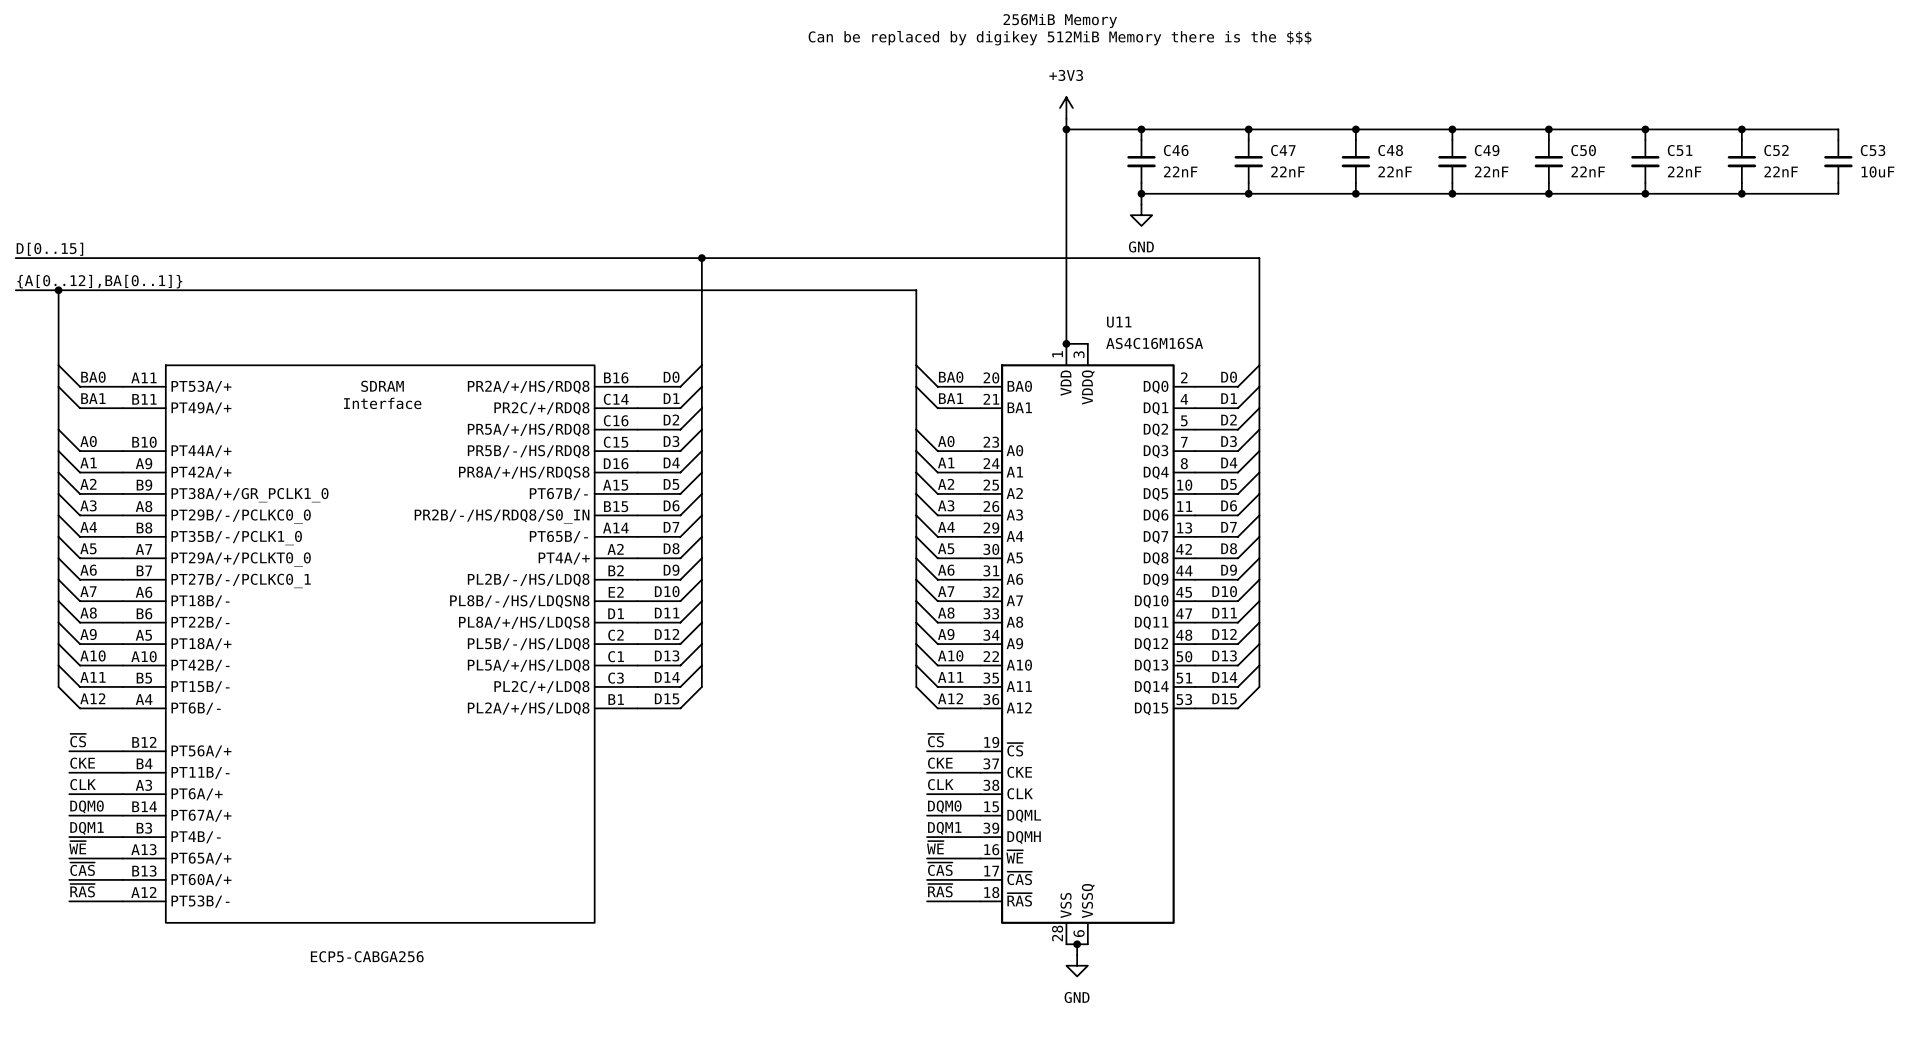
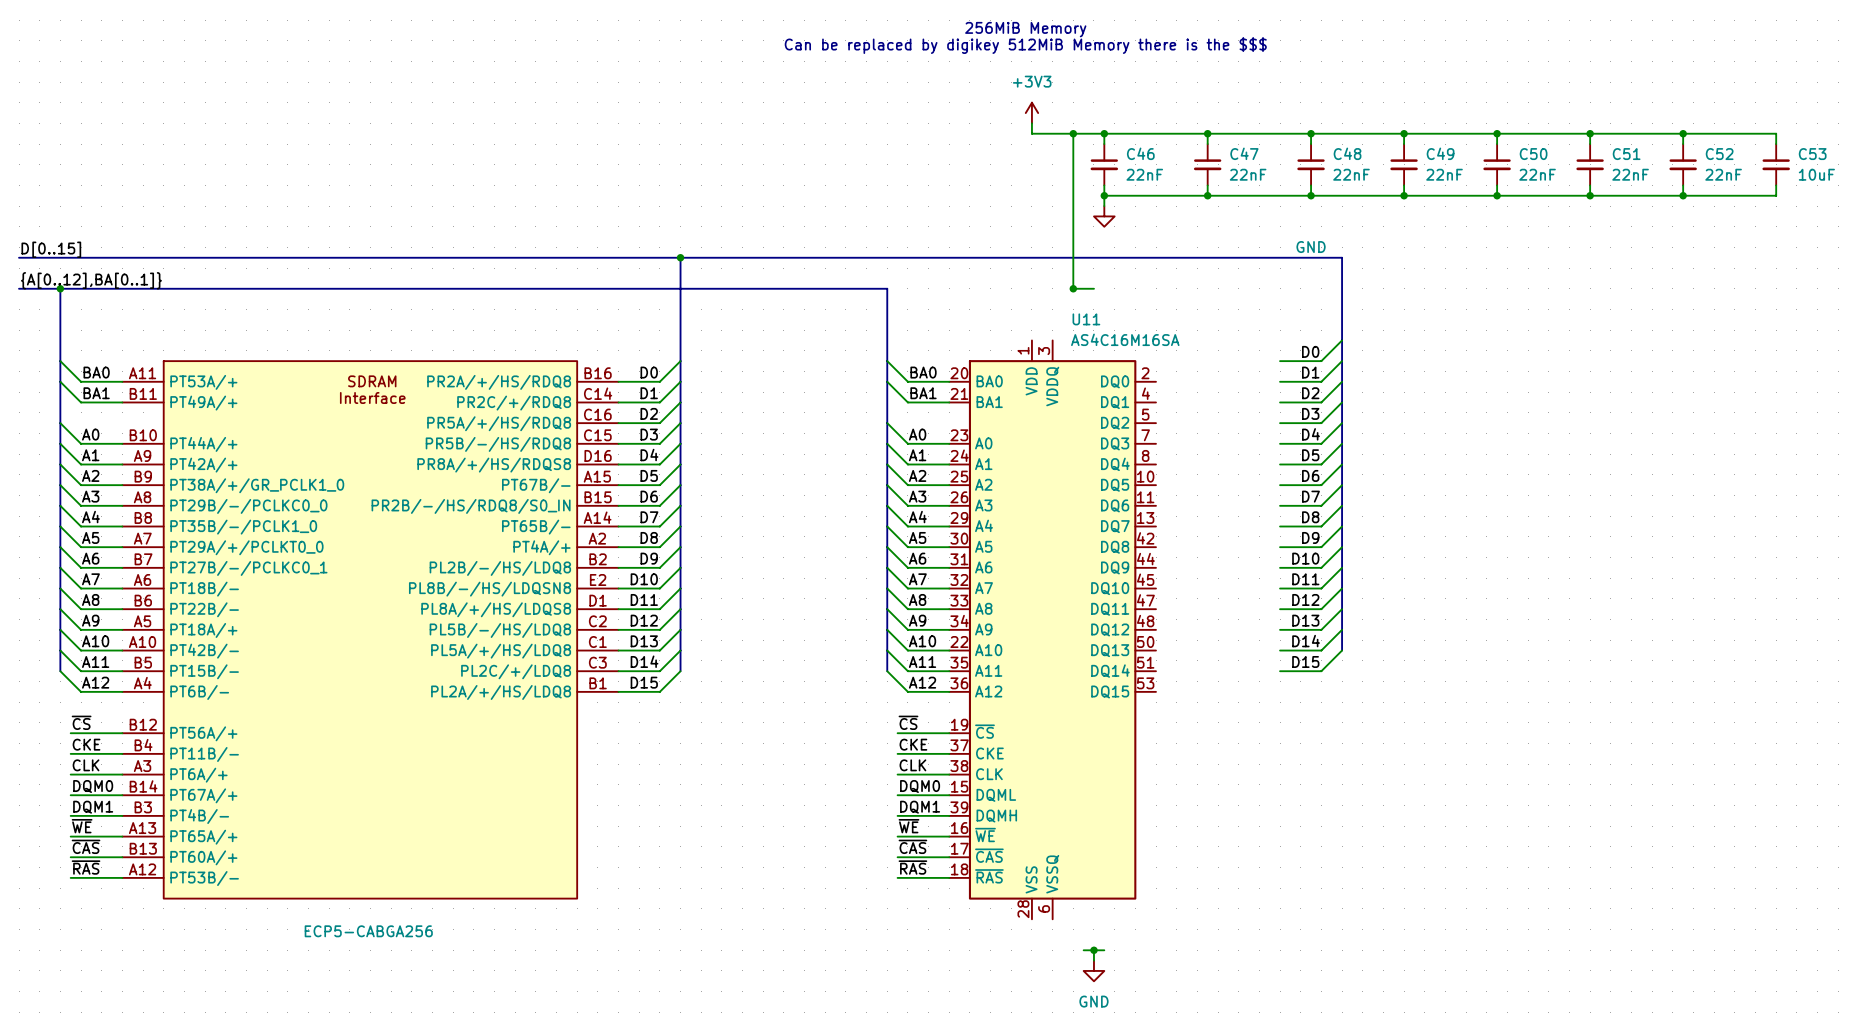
wire: (1066, 129) (1066, 343) (1087, 343) -> none
junction position: (1066, 129) -> (1073, 133)
wire: none -> (1073, 133) (1073, 288) (1093, 288)
power symbol text position: GND (1141, 246) -> GND (1311, 247)
bus: (1259, 258) (1259, 686) -> (1218, 257) (1342, 257) (1342, 650)
junction: none -> (1073, 288)
junction: (1066, 343) -> none
wire: (1259, 365) (1237, 386) (1195, 386) -> (1342, 340) (1321, 361) (1280, 361)
label position: D0 (1229, 377) -> D0 (1310, 351)
wire: (1259, 386) (1237, 408) (1195, 408) -> (1342, 361) (1321, 381) (1280, 381)
label position: D1 (1229, 398) -> D1 (1310, 372)
wire: (1259, 408) (1237, 429) (1195, 429) -> (1342, 381) (1321, 402) (1280, 402)
label position: D2 (1228, 419) -> D2 (1310, 393)
wire: (1259, 429) (1237, 451) (1195, 451) -> (1342, 402) (1321, 423) (1280, 423)
label position: D3 (1229, 441) -> D3 (1310, 413)
wire: (1259, 451) (1237, 472) (1195, 472) -> (1342, 423) (1321, 443) (1280, 443)
label position: D4 (1229, 462) -> D4 (1310, 434)
wire: (1259, 472) (1237, 493) (1195, 493) -> (1342, 443) (1321, 464) (1280, 464)
label position: D5 (1229, 484) -> D5 (1310, 455)
wire: (1259, 493) (1237, 515) (1195, 515) -> (1342, 464) (1321, 485) (1280, 485)
label position: D6 (1229, 505) -> D6 (1310, 475)
wire: (1259, 515) (1237, 536) (1195, 536) -> (1342, 485) (1321, 505) (1280, 505)
label position: D7 (1229, 527) -> D7 (1310, 496)
wire: (1259, 536) (1237, 558) (1195, 558) -> (1342, 505) (1321, 526) (1280, 526)
label position: D8 (1229, 548) -> D8 (1310, 517)
wire: (1259, 558) (1237, 579) (1195, 579) -> (1342, 526) (1321, 547) (1280, 547)
label position: D9 (1229, 570) -> D9 (1310, 537)
wire: (1259, 579) (1237, 601) (1195, 601) -> (1342, 547) (1321, 567) (1280, 567)
label position: D10 (1224, 591) -> D10 (1305, 558)
wire: (1259, 601) (1237, 622) (1195, 622) -> (1342, 567) (1321, 588) (1280, 588)
label position: D11 (1224, 613) -> D11 (1305, 579)
wire: (1259, 622) (1237, 644) (1195, 644) -> (1342, 588) (1321, 609) (1280, 609)
label position: D12 (1224, 634) -> D12 (1305, 599)
wire: (1259, 644) (1237, 665) (1195, 665) -> (1342, 609) (1321, 629) (1280, 629)
label position: D13 (1224, 655) -> D13 (1305, 620)
wire: (1259, 665) (1237, 686) (1195, 686) -> (1342, 629) (1321, 650) (1280, 650)
label position: D14 (1224, 677) -> D14 (1306, 641)
wire: (1259, 686) (1237, 708) (1195, 708) -> (1342, 650) (1321, 671) (1280, 671)
label position: D15 (1224, 698) -> D15 (1305, 661)
wire: (1066, 944) (1087, 944) -> (1083, 950) (1104, 950)
wire: (1077, 944) (1077, 955) -> (1093, 950) (1093, 960)
junction: (1077, 944) -> none
power symbol position: GND (1077, 965) -> GND (1093, 970)
junction: none -> (1093, 950)

